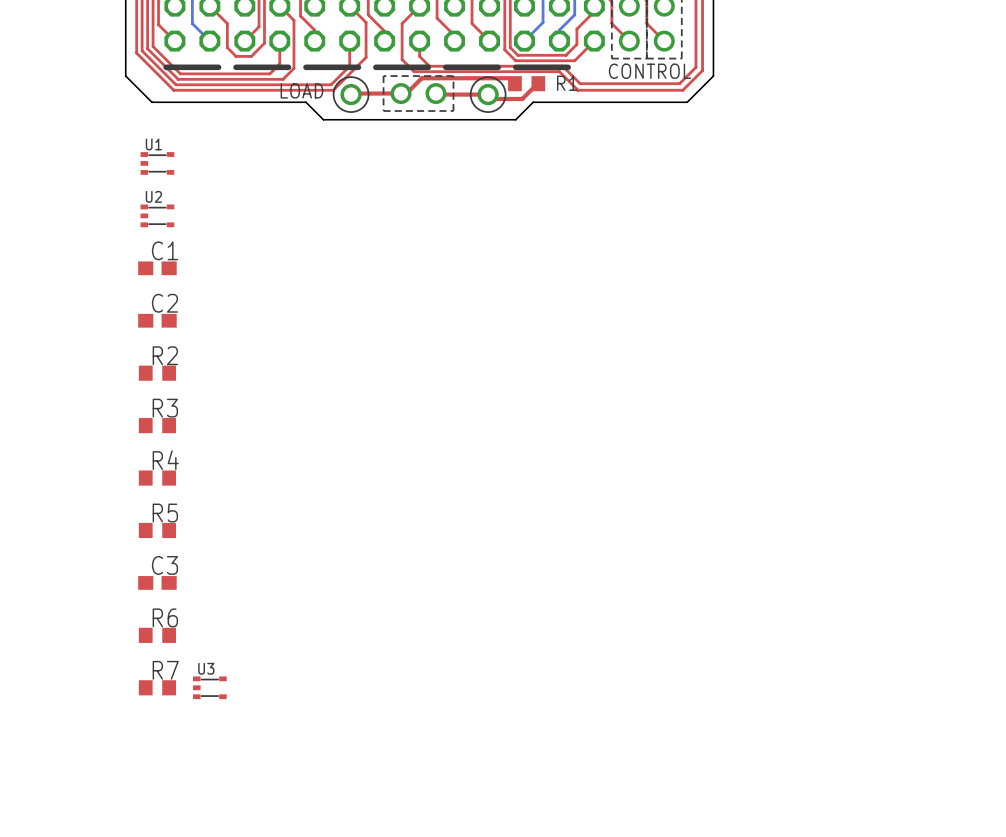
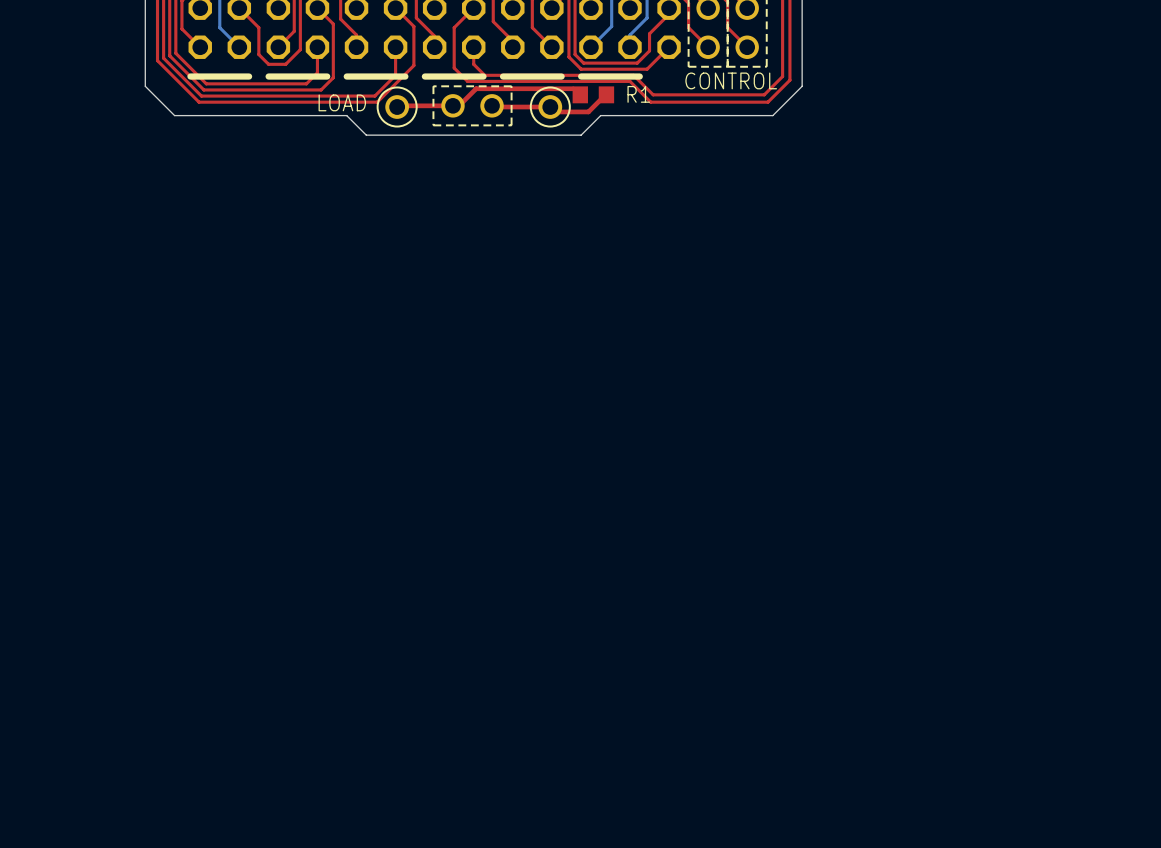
U1: (157, 163) -> none
U2: (157, 215) -> none
C1: (157, 268) -> none
C2: (157, 320) -> none
R2: (157, 373) -> none
R3: (157, 425) -> none
R4: (157, 478) -> none
R5: (157, 530) -> none
C3: (157, 582) -> none
R6: (157, 635) -> none
R7: (157, 687) -> none
U3: (209, 687) -> none

